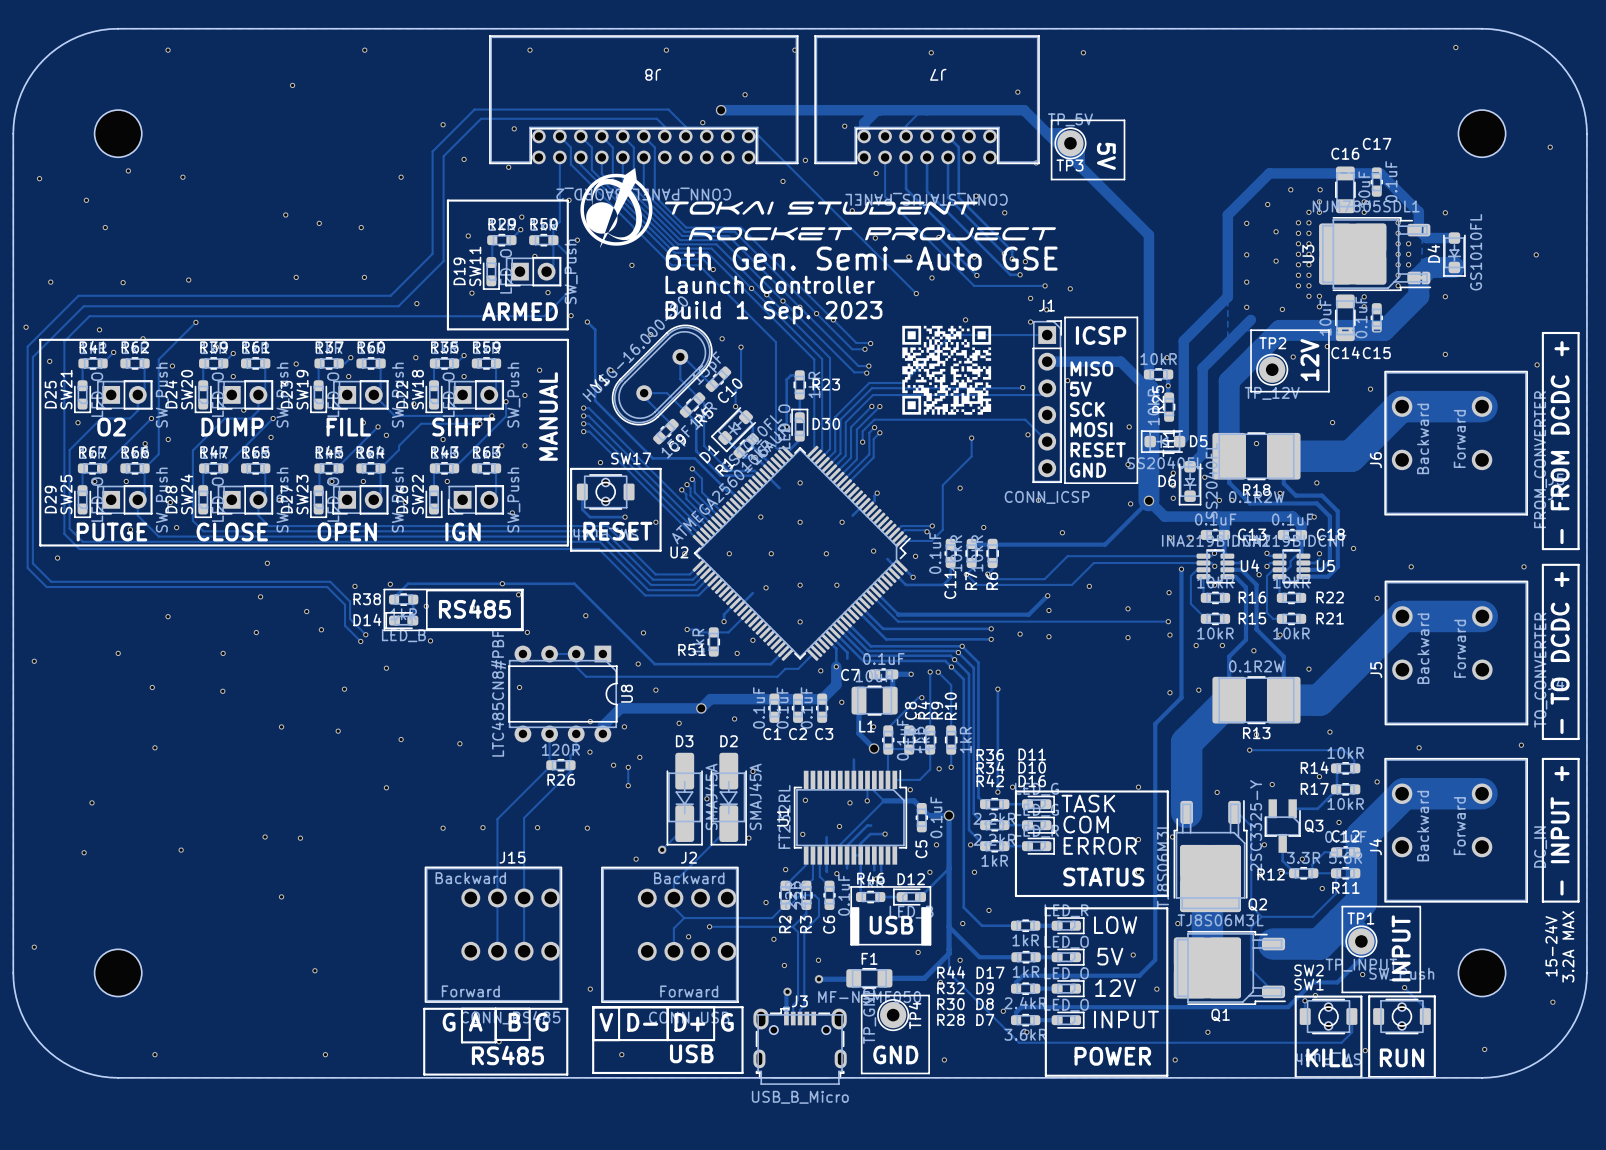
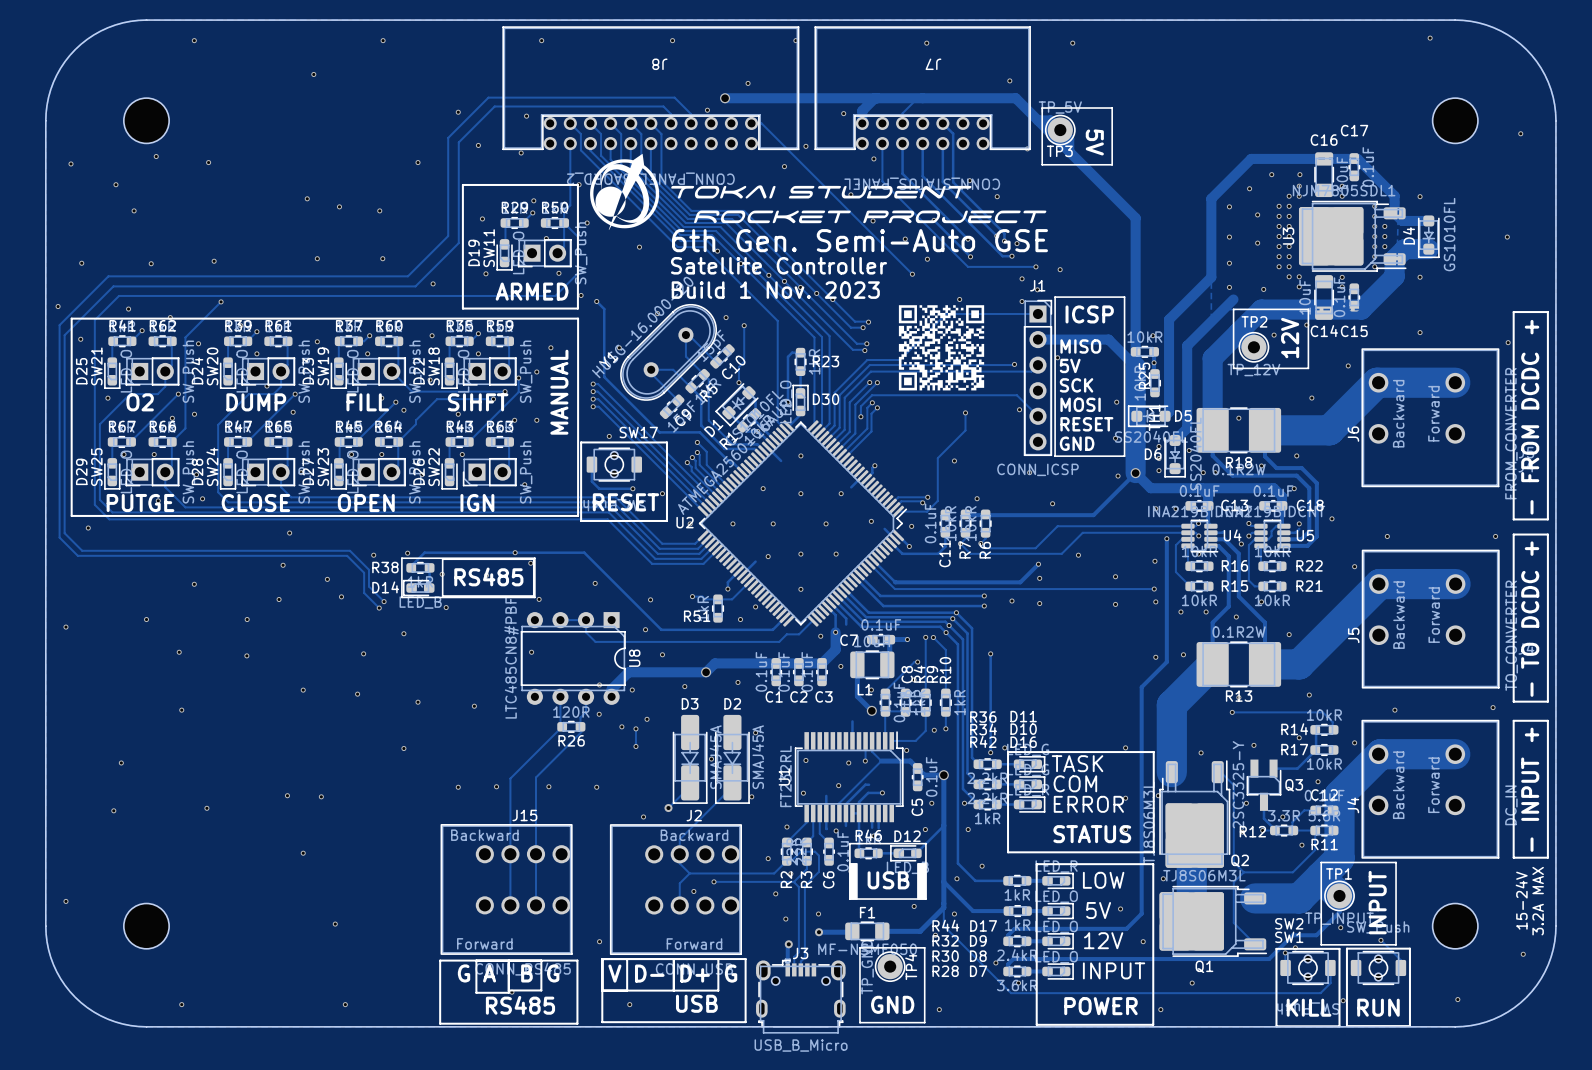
text: Launch Controller (770, 284) -> Satellite Controller (779, 265)
text: Build 1 Sep. 2023 (773, 312) -> Build 1 Nov. 2023 (775, 290)

